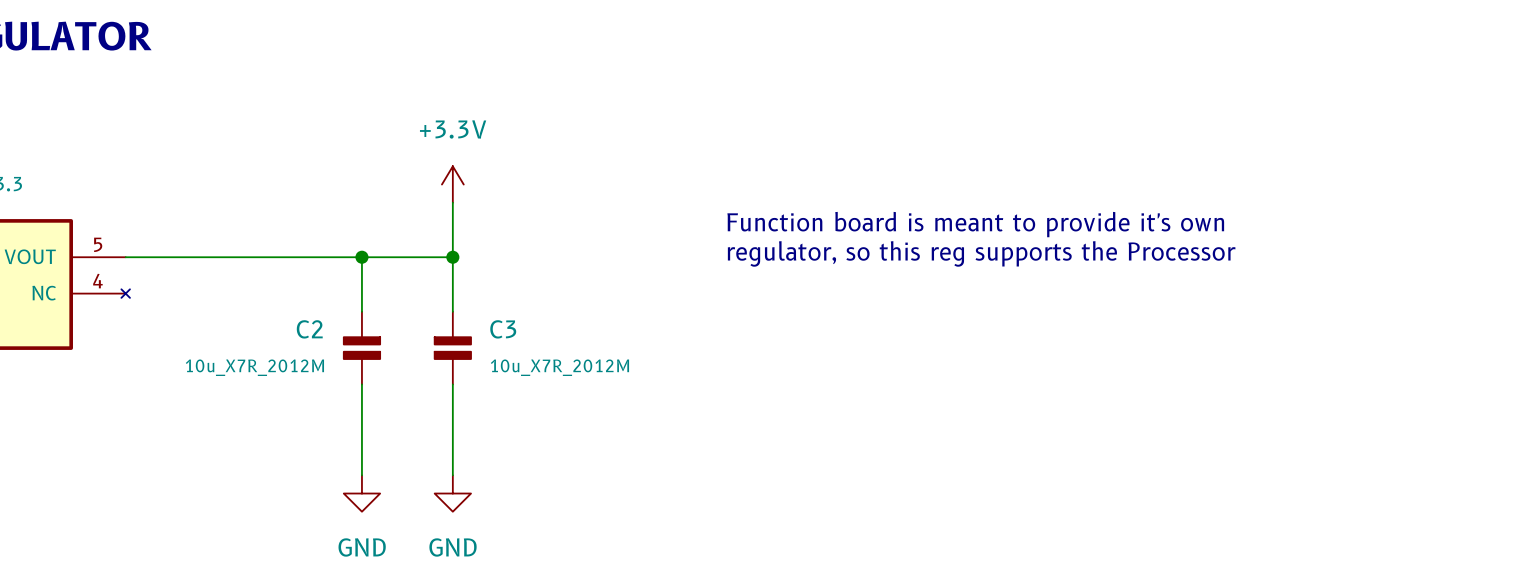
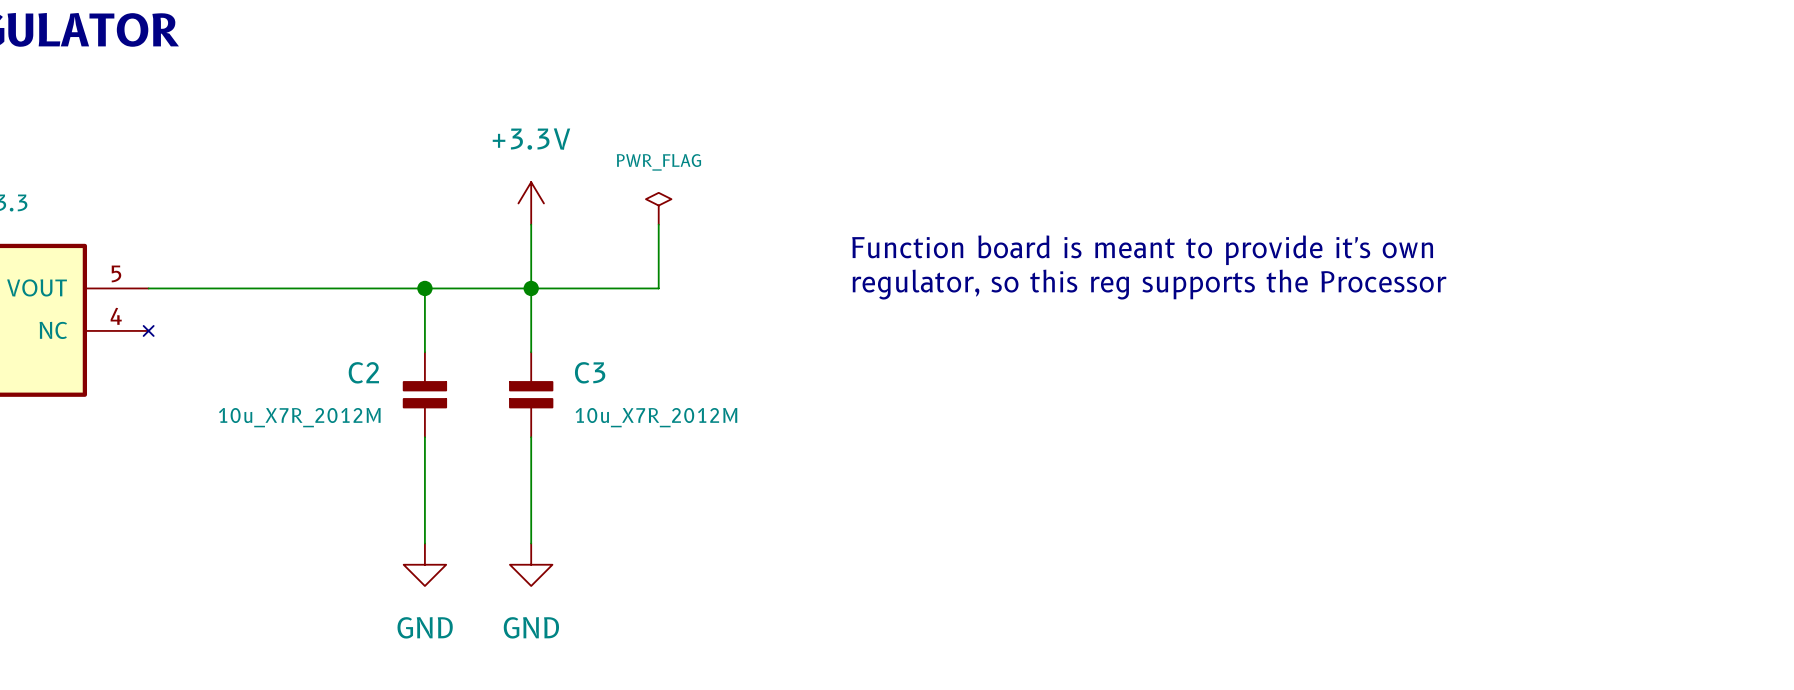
power symbol: none -> PWR_FLAG (658, 208)
wire: none -> (658, 224) (658, 288) (531, 288)

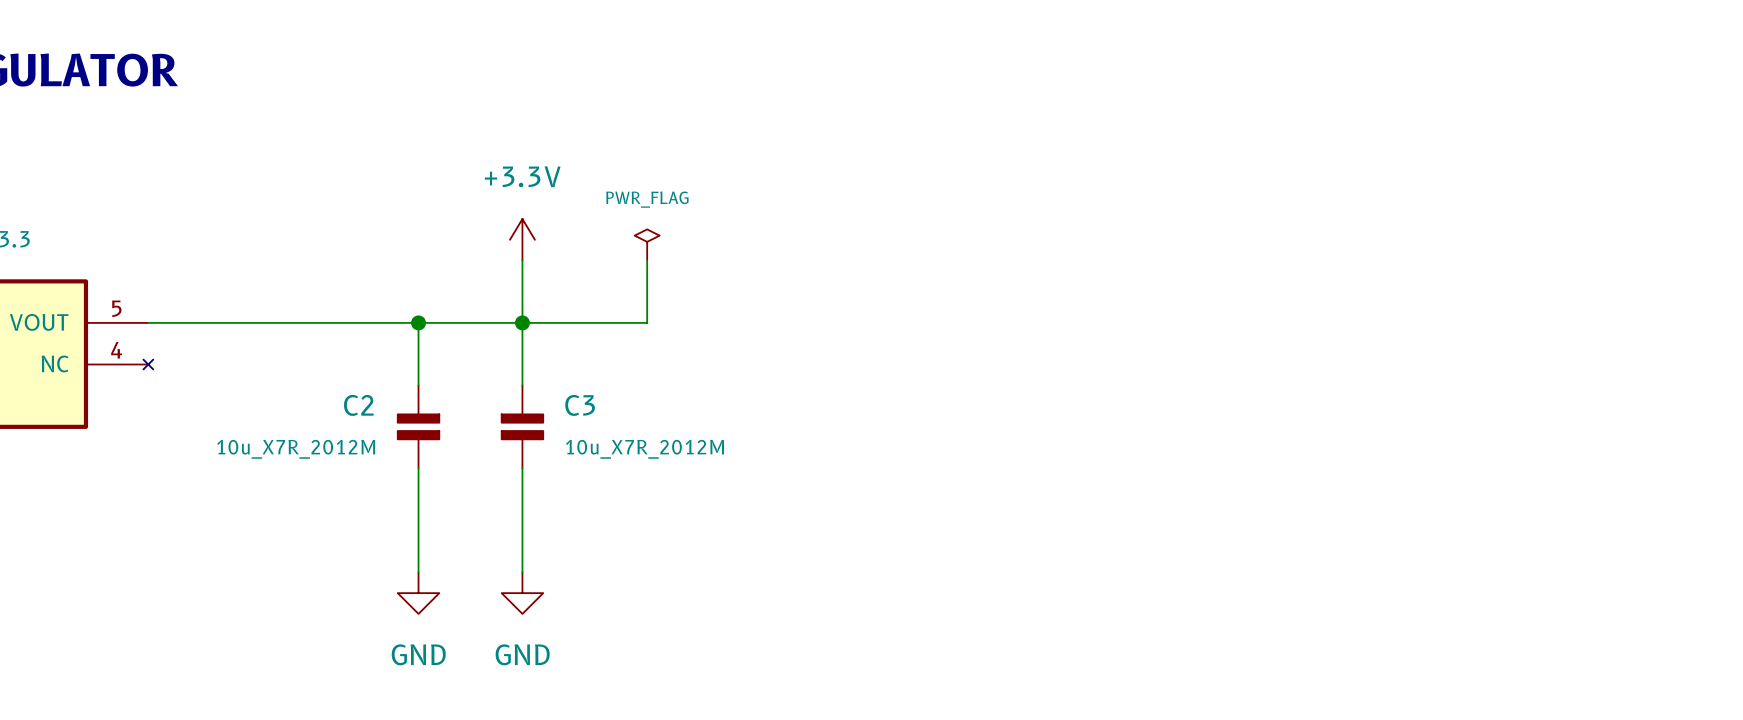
text: Function board is meant to provide it's own (1142, 250) -> none
text: regulator, so this reg supports the Processor (1149, 284) -> none

